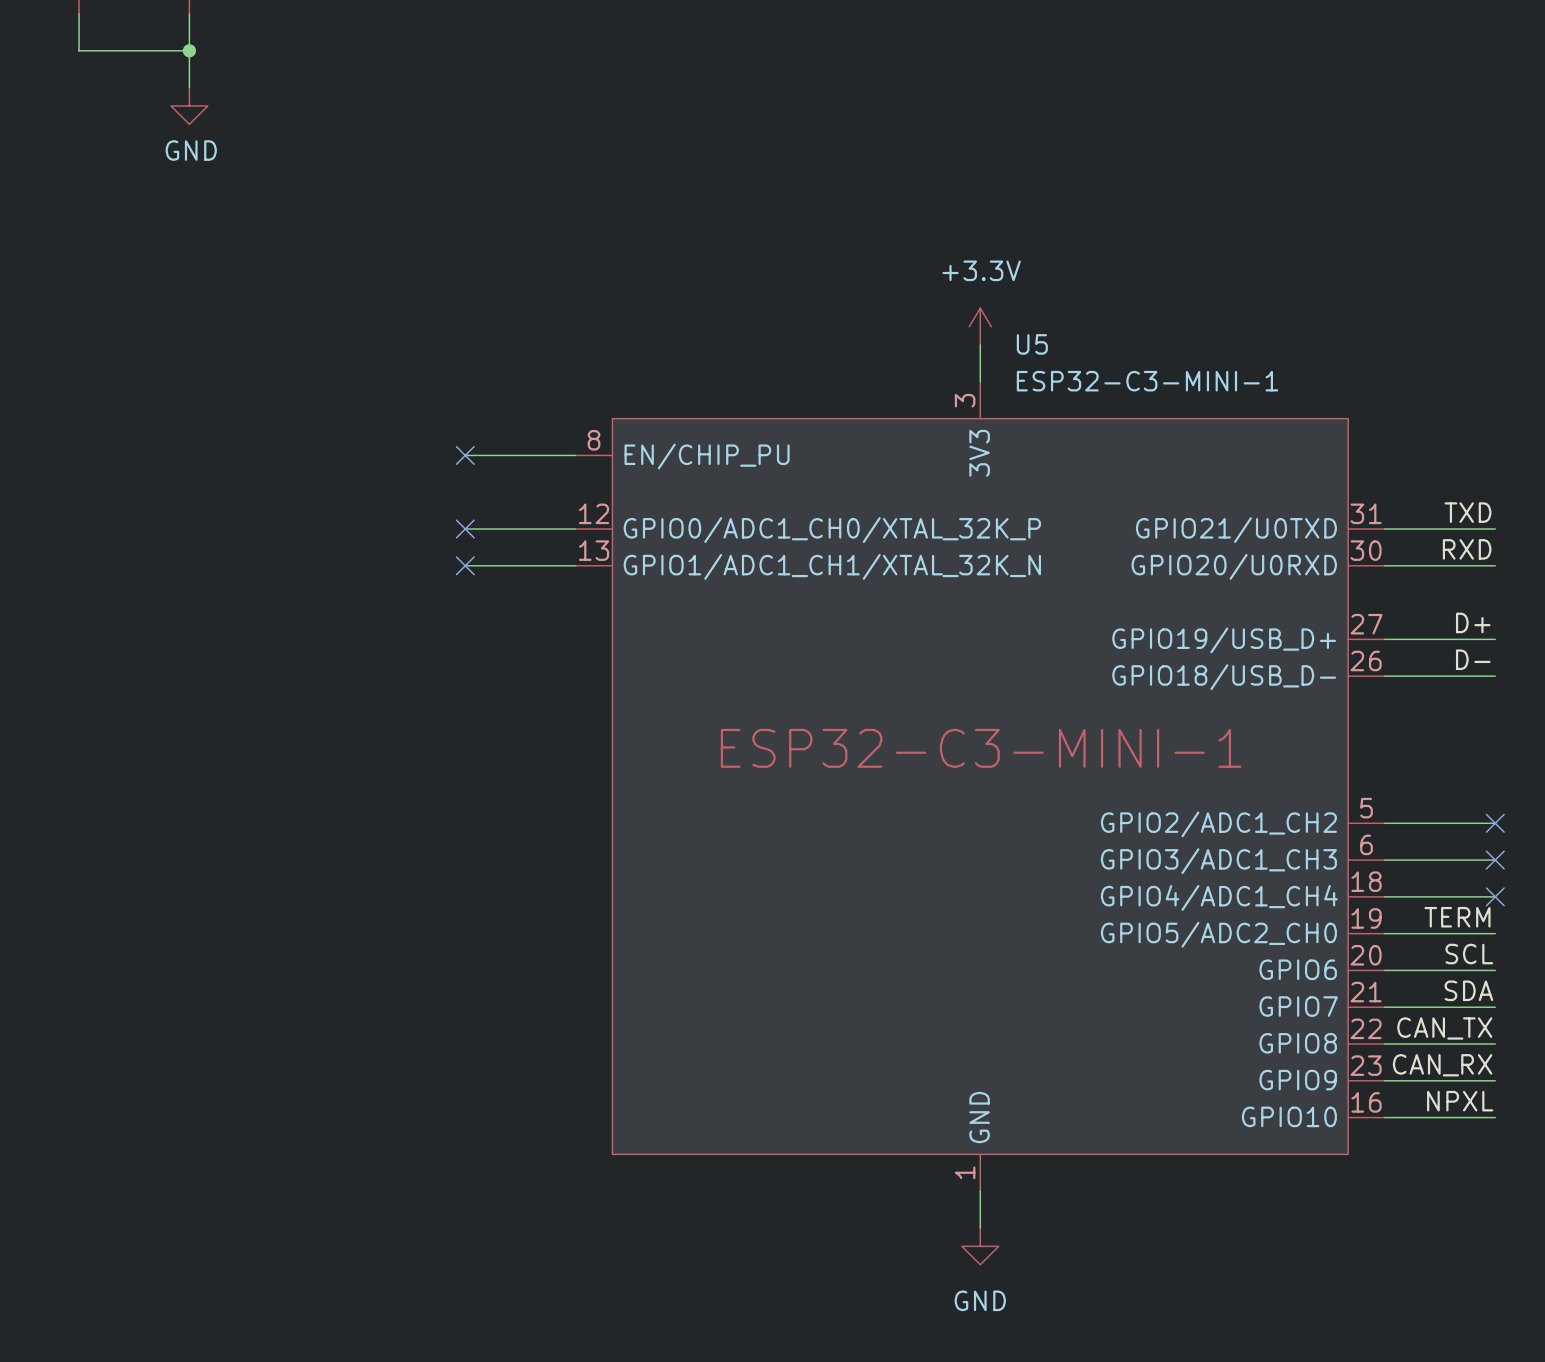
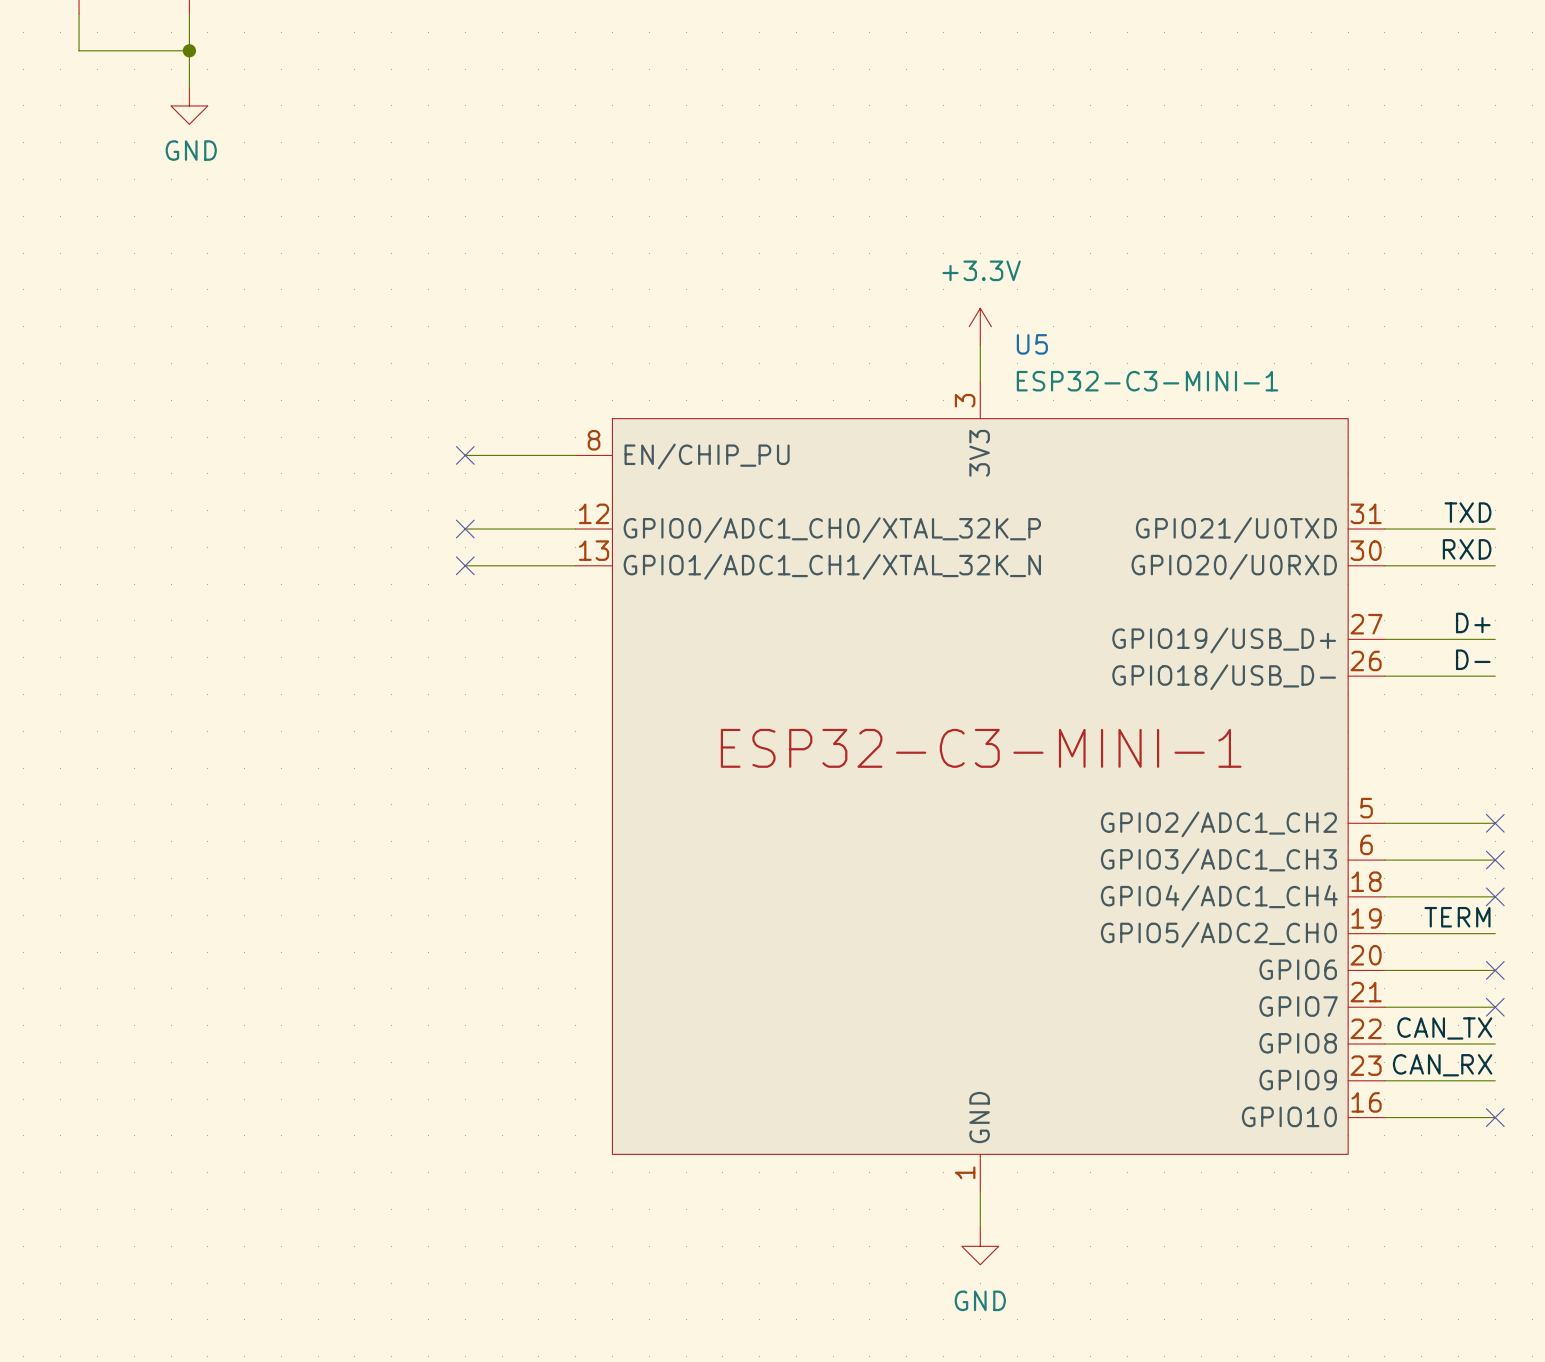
label: SCL (1469, 954) -> none
no-connect mark: none -> (1495, 970)
label: SDA (1468, 990) -> none
no-connect mark: none -> (1495, 1007)
label: NPXL (1460, 1101) -> none
no-connect mark: none -> (1495, 1117)

